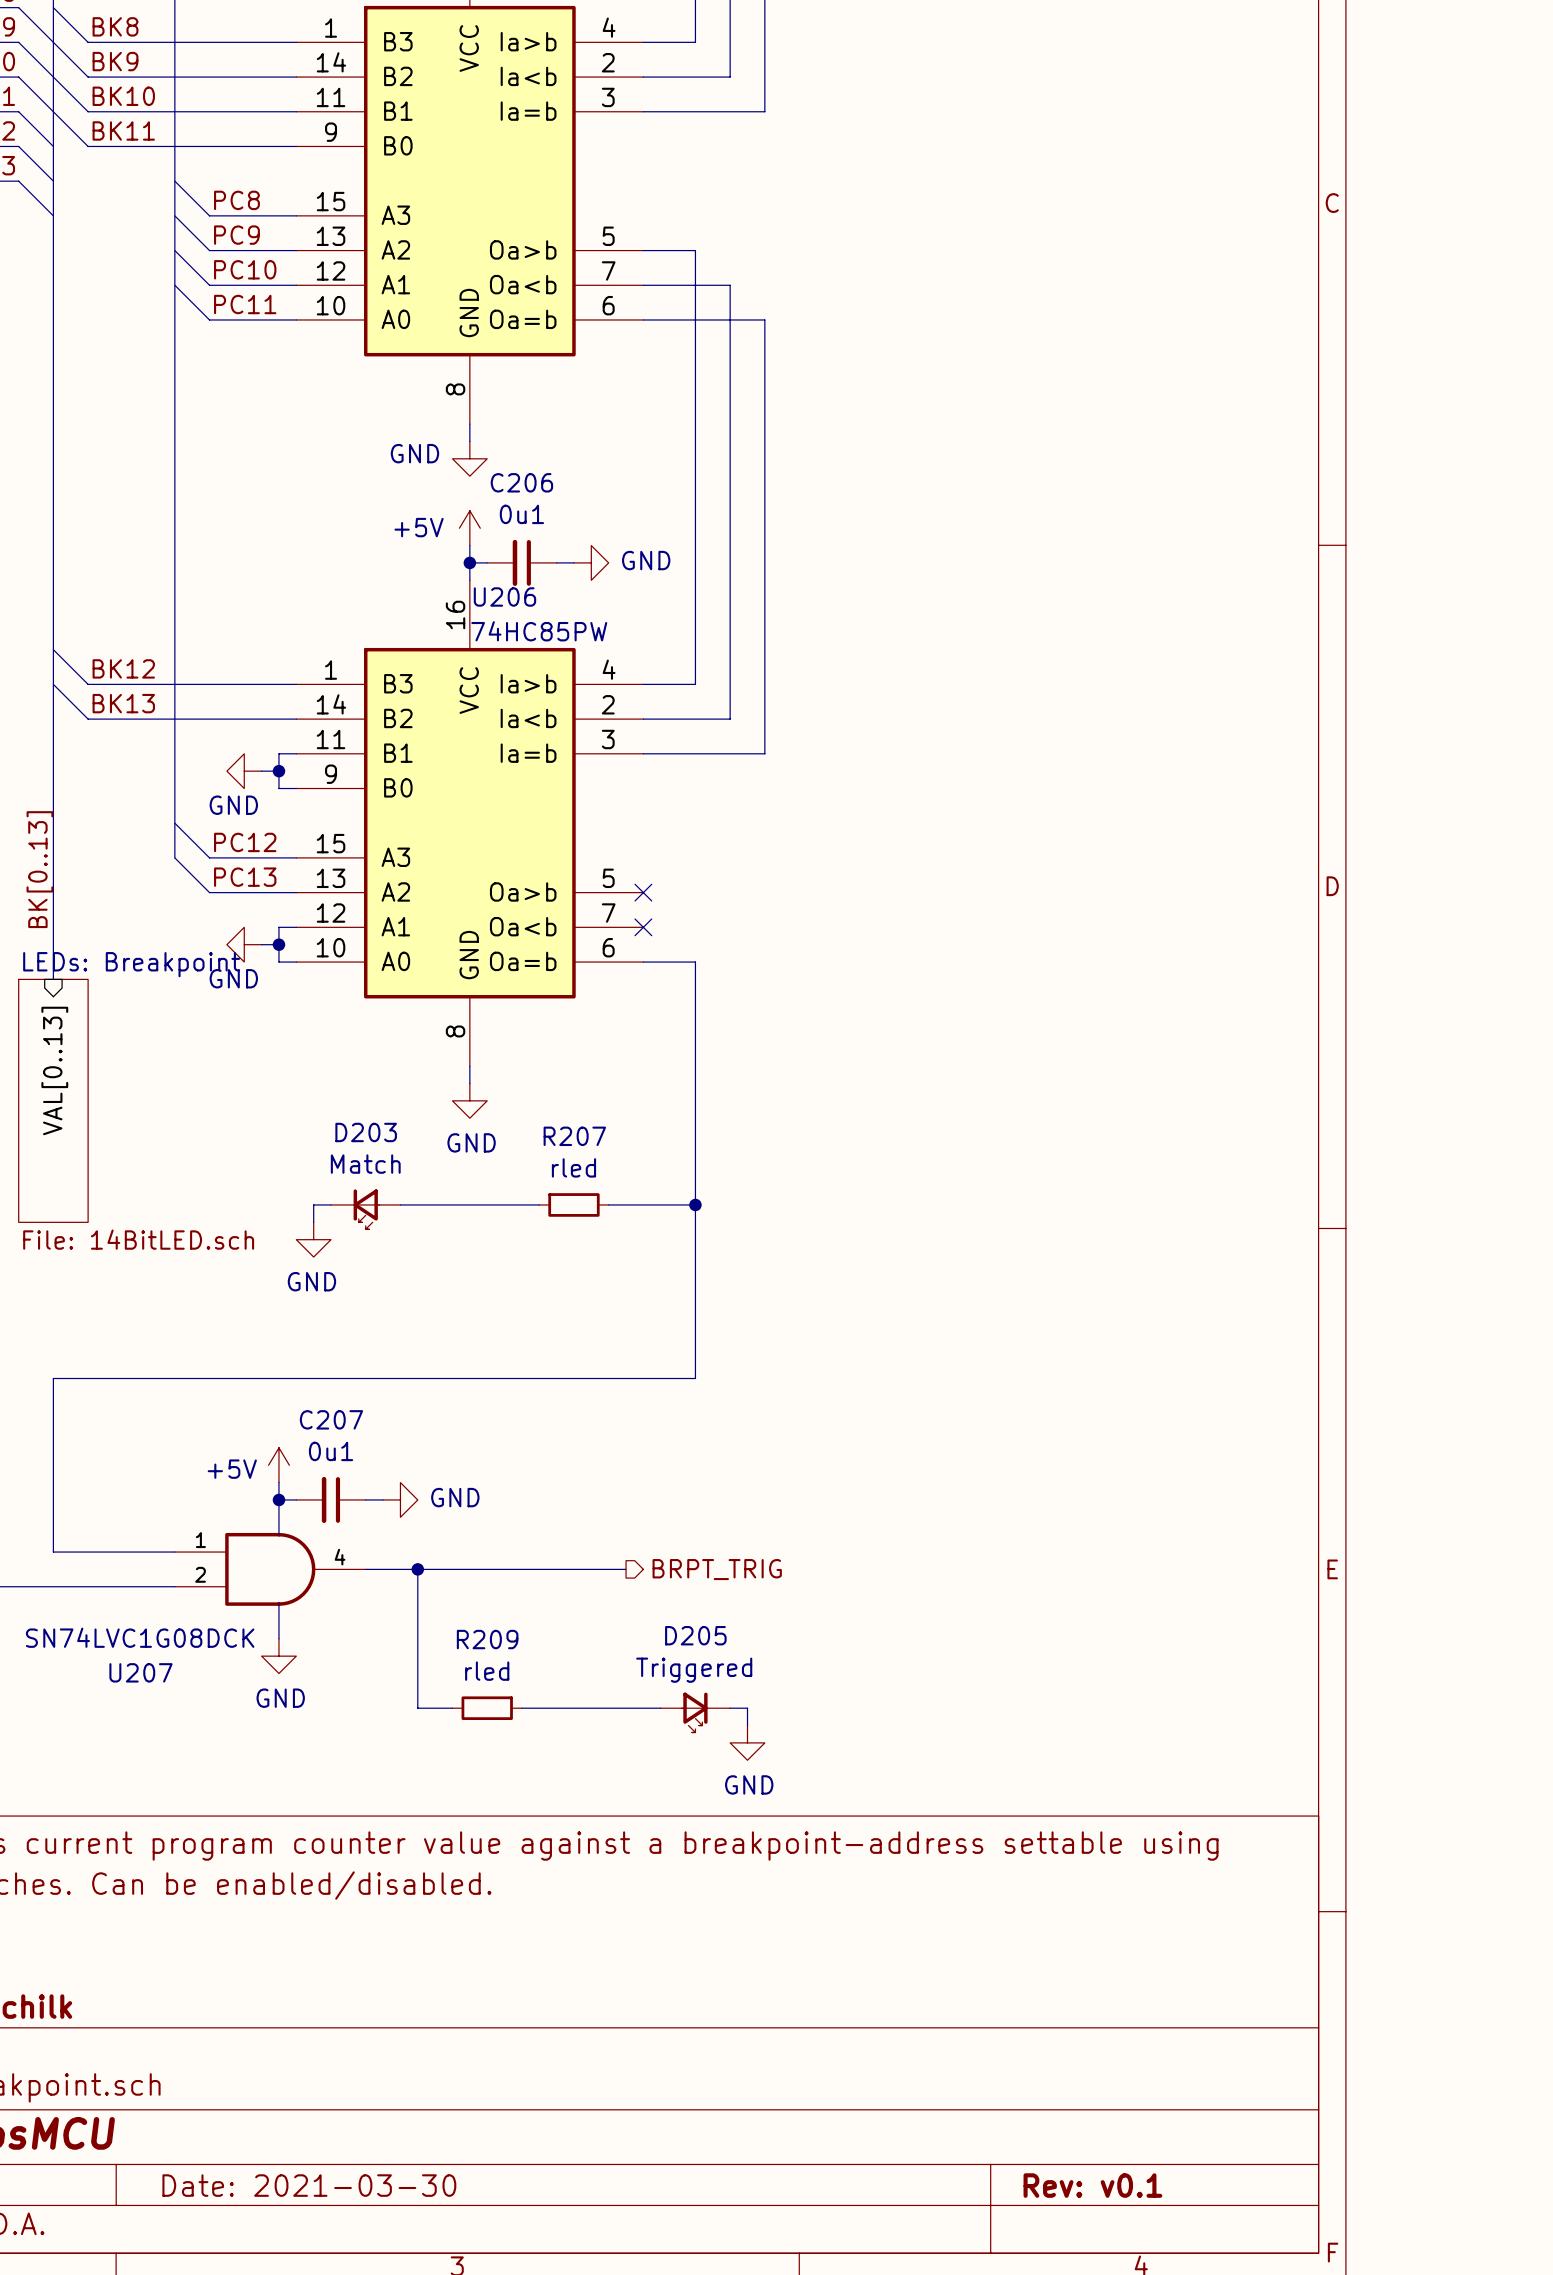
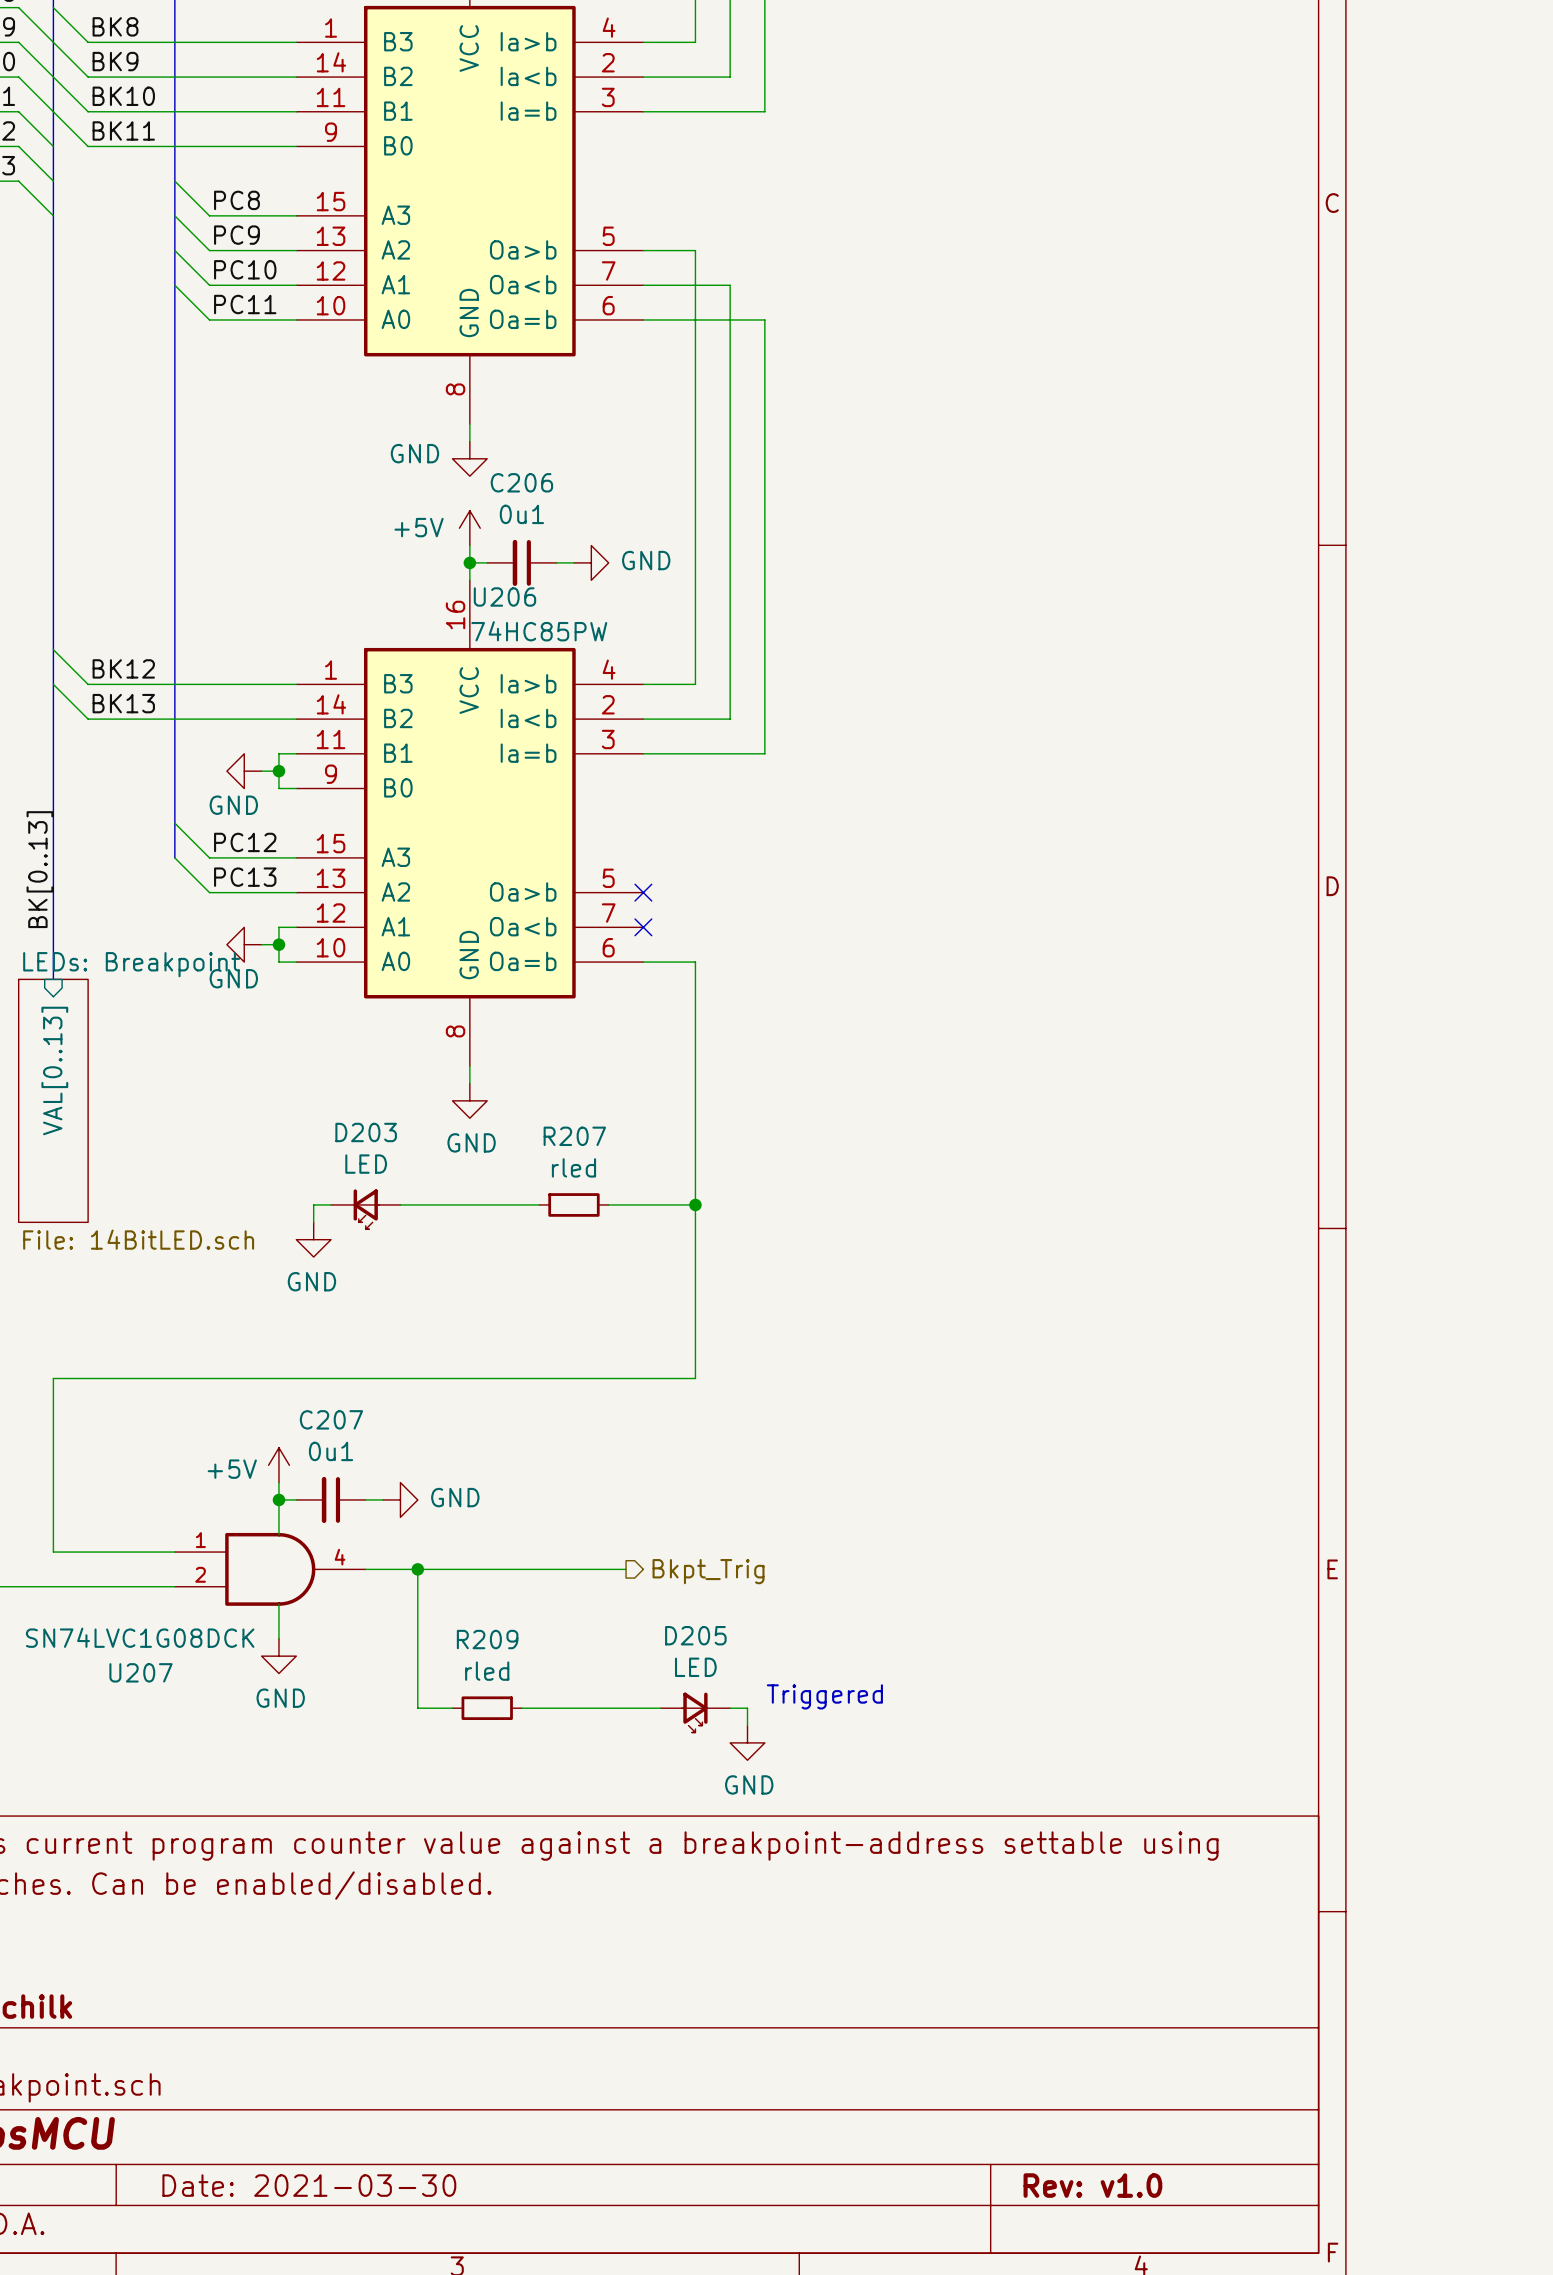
D203 value: Match (365, 1164) -> LED (366, 1164)
hierarchical label: BRPT_TRIG (717, 1569) -> Bkpt_Trig (708, 1571)
D205 value: Triggered (694, 1670) -> LED (695, 1667)
text: none -> Triggered (824, 1696)
title block: Rev: v0.1 (1092, 2185) -> Rev: v1.0 (1092, 2185)

